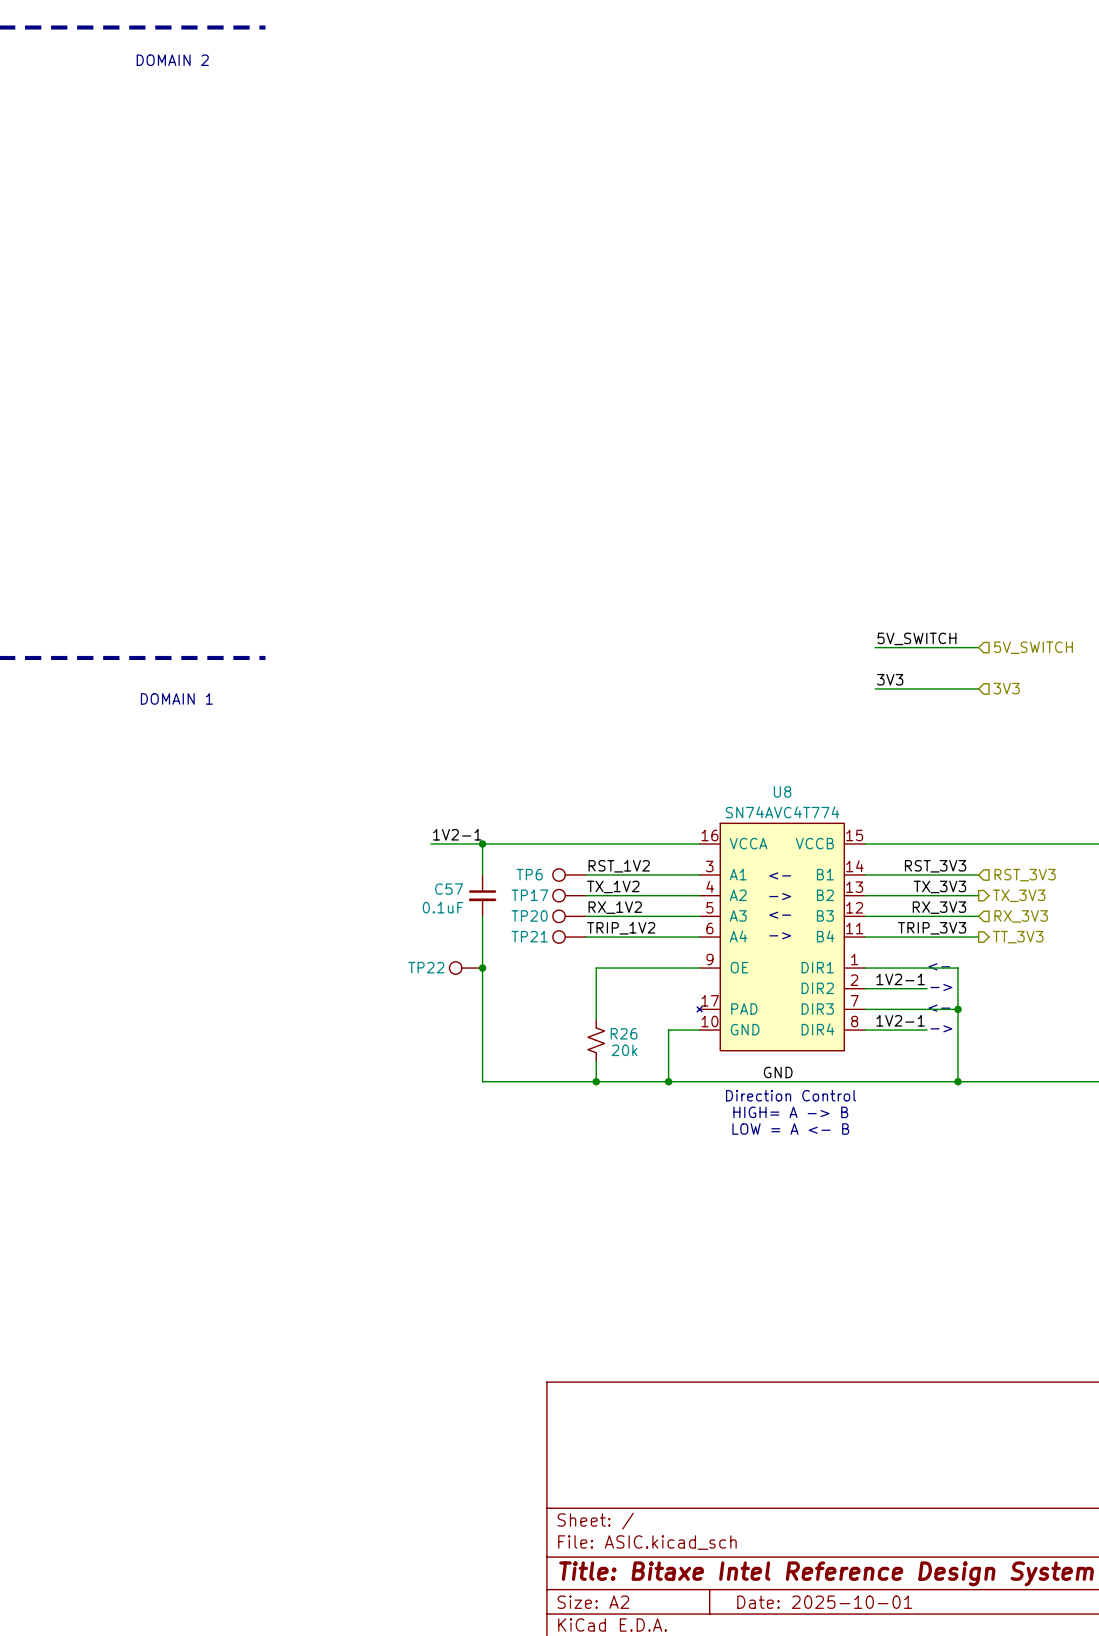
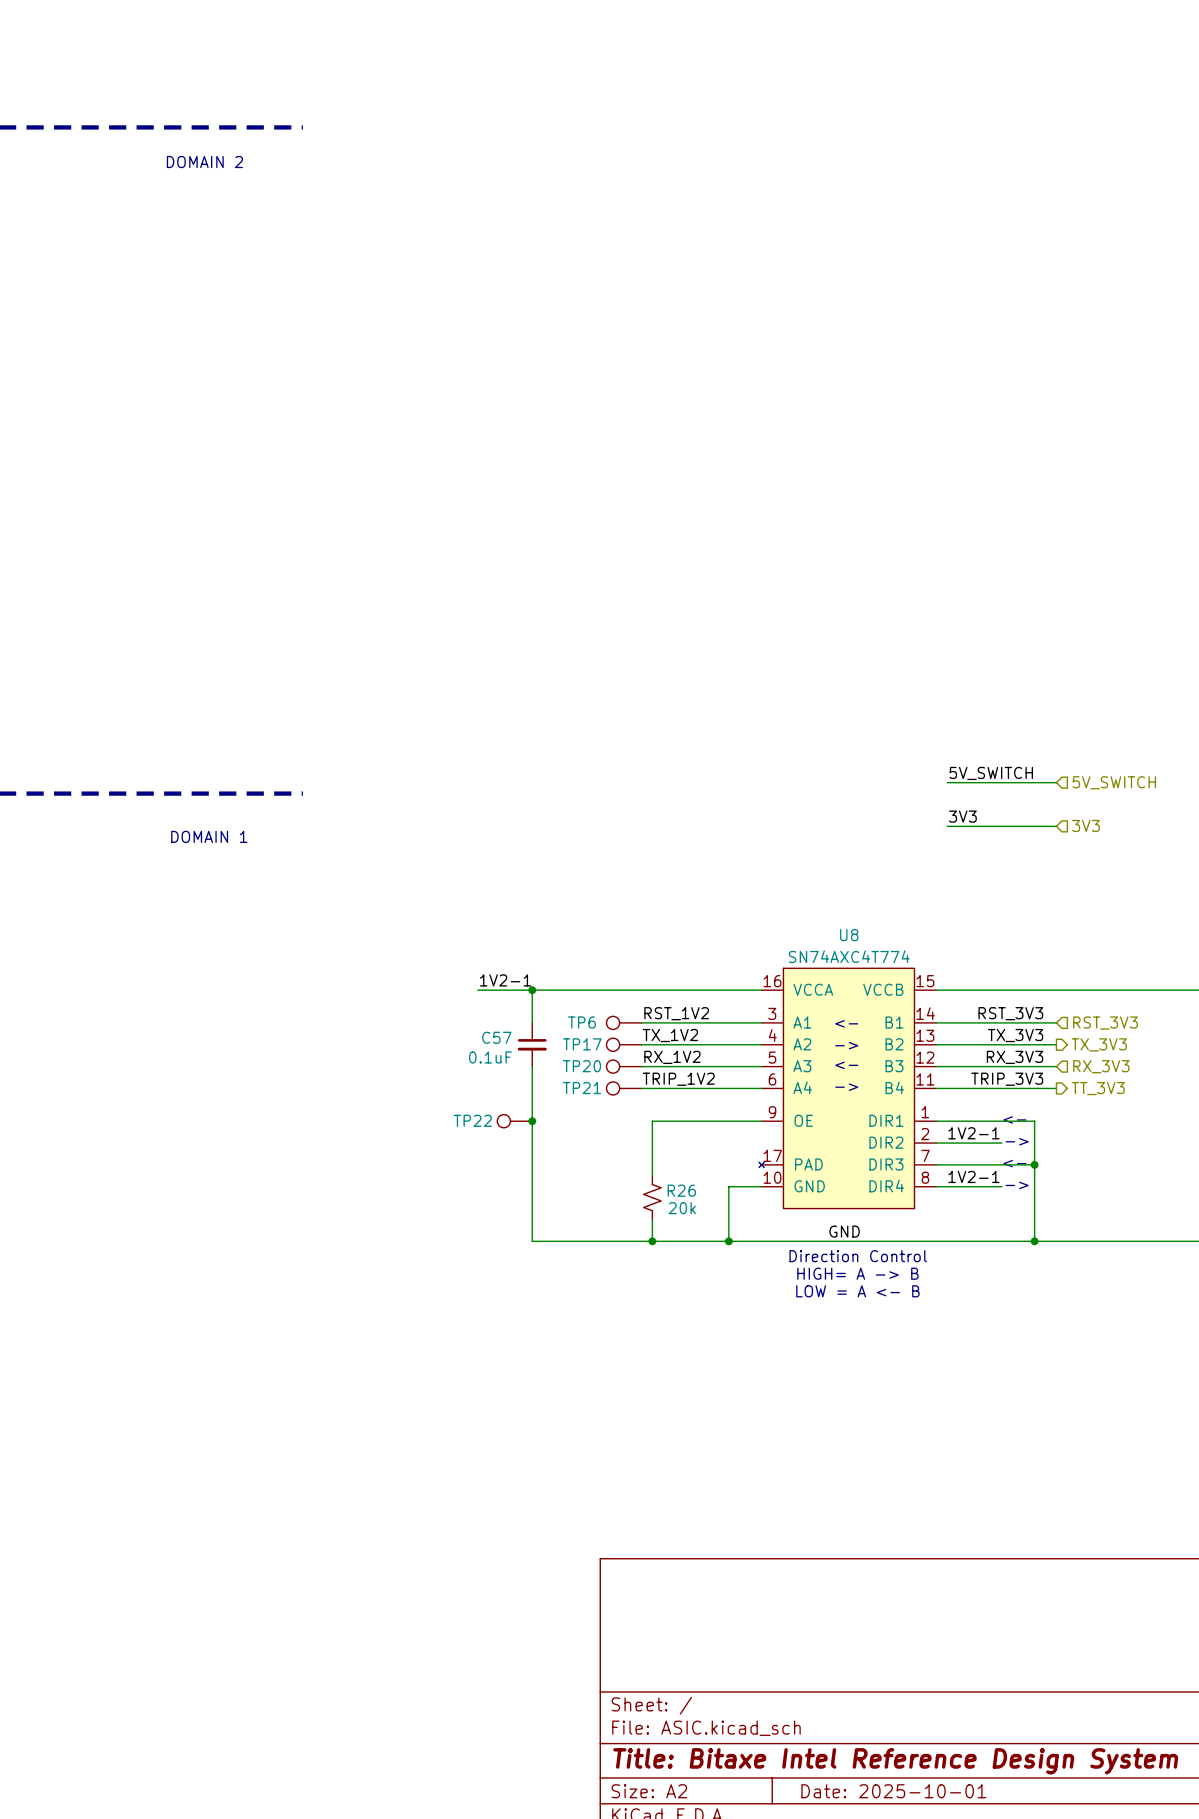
U8 value: SN74AVC4T774 (782, 812) -> SN74AXC4T774 (849, 956)

